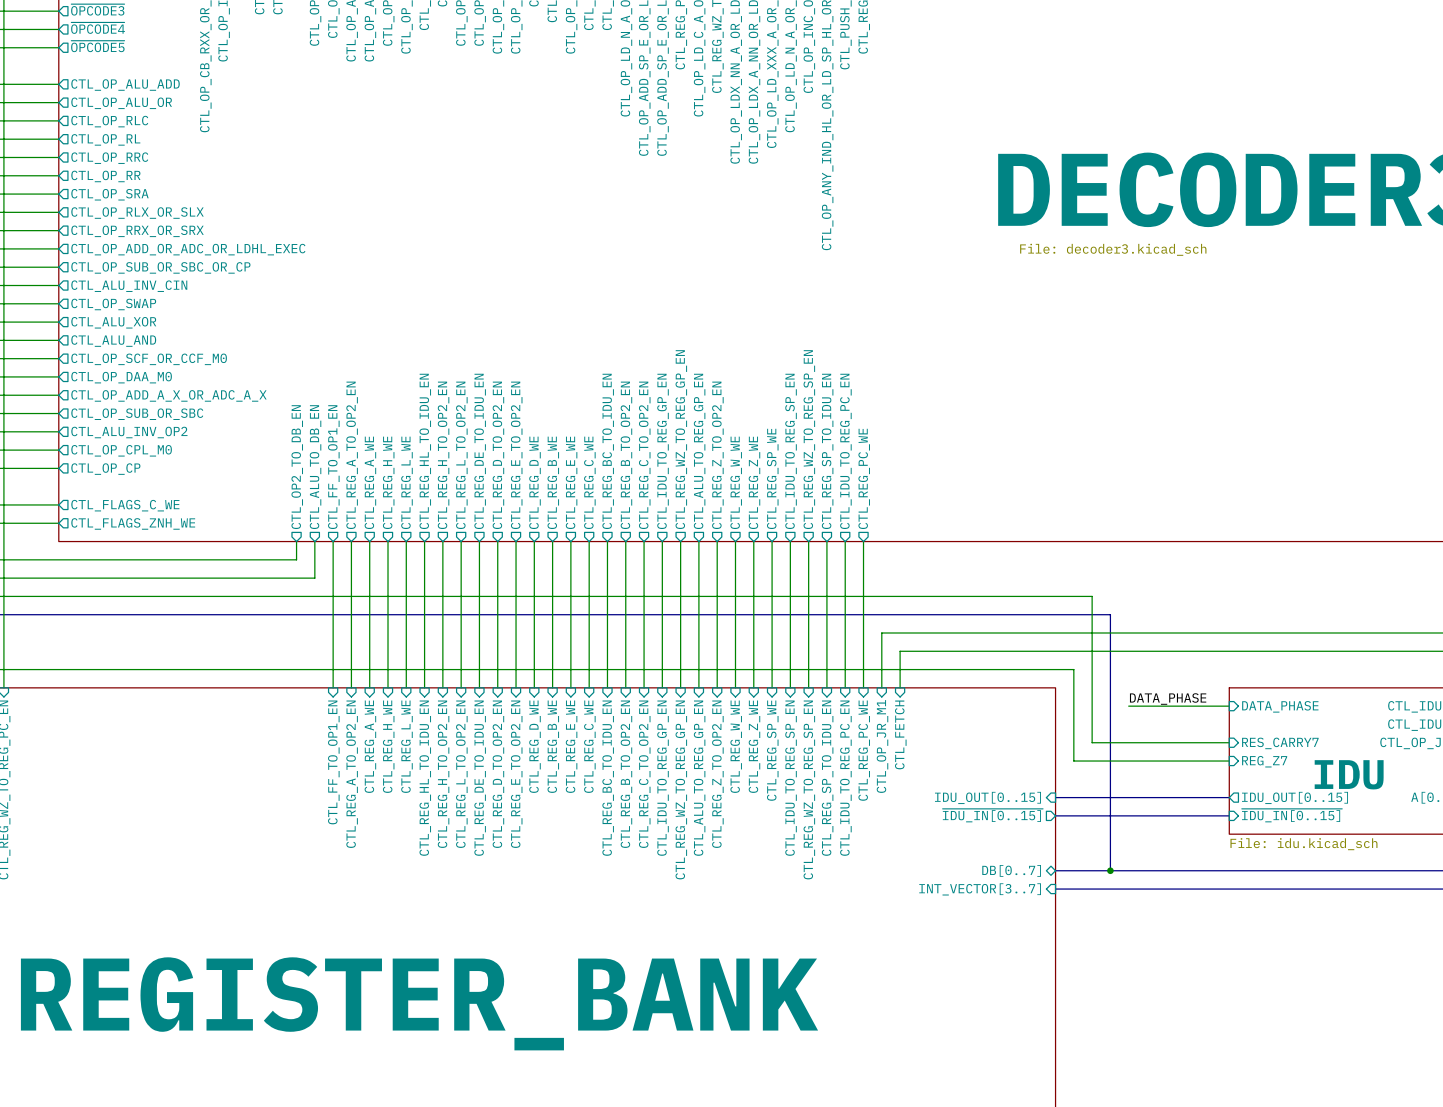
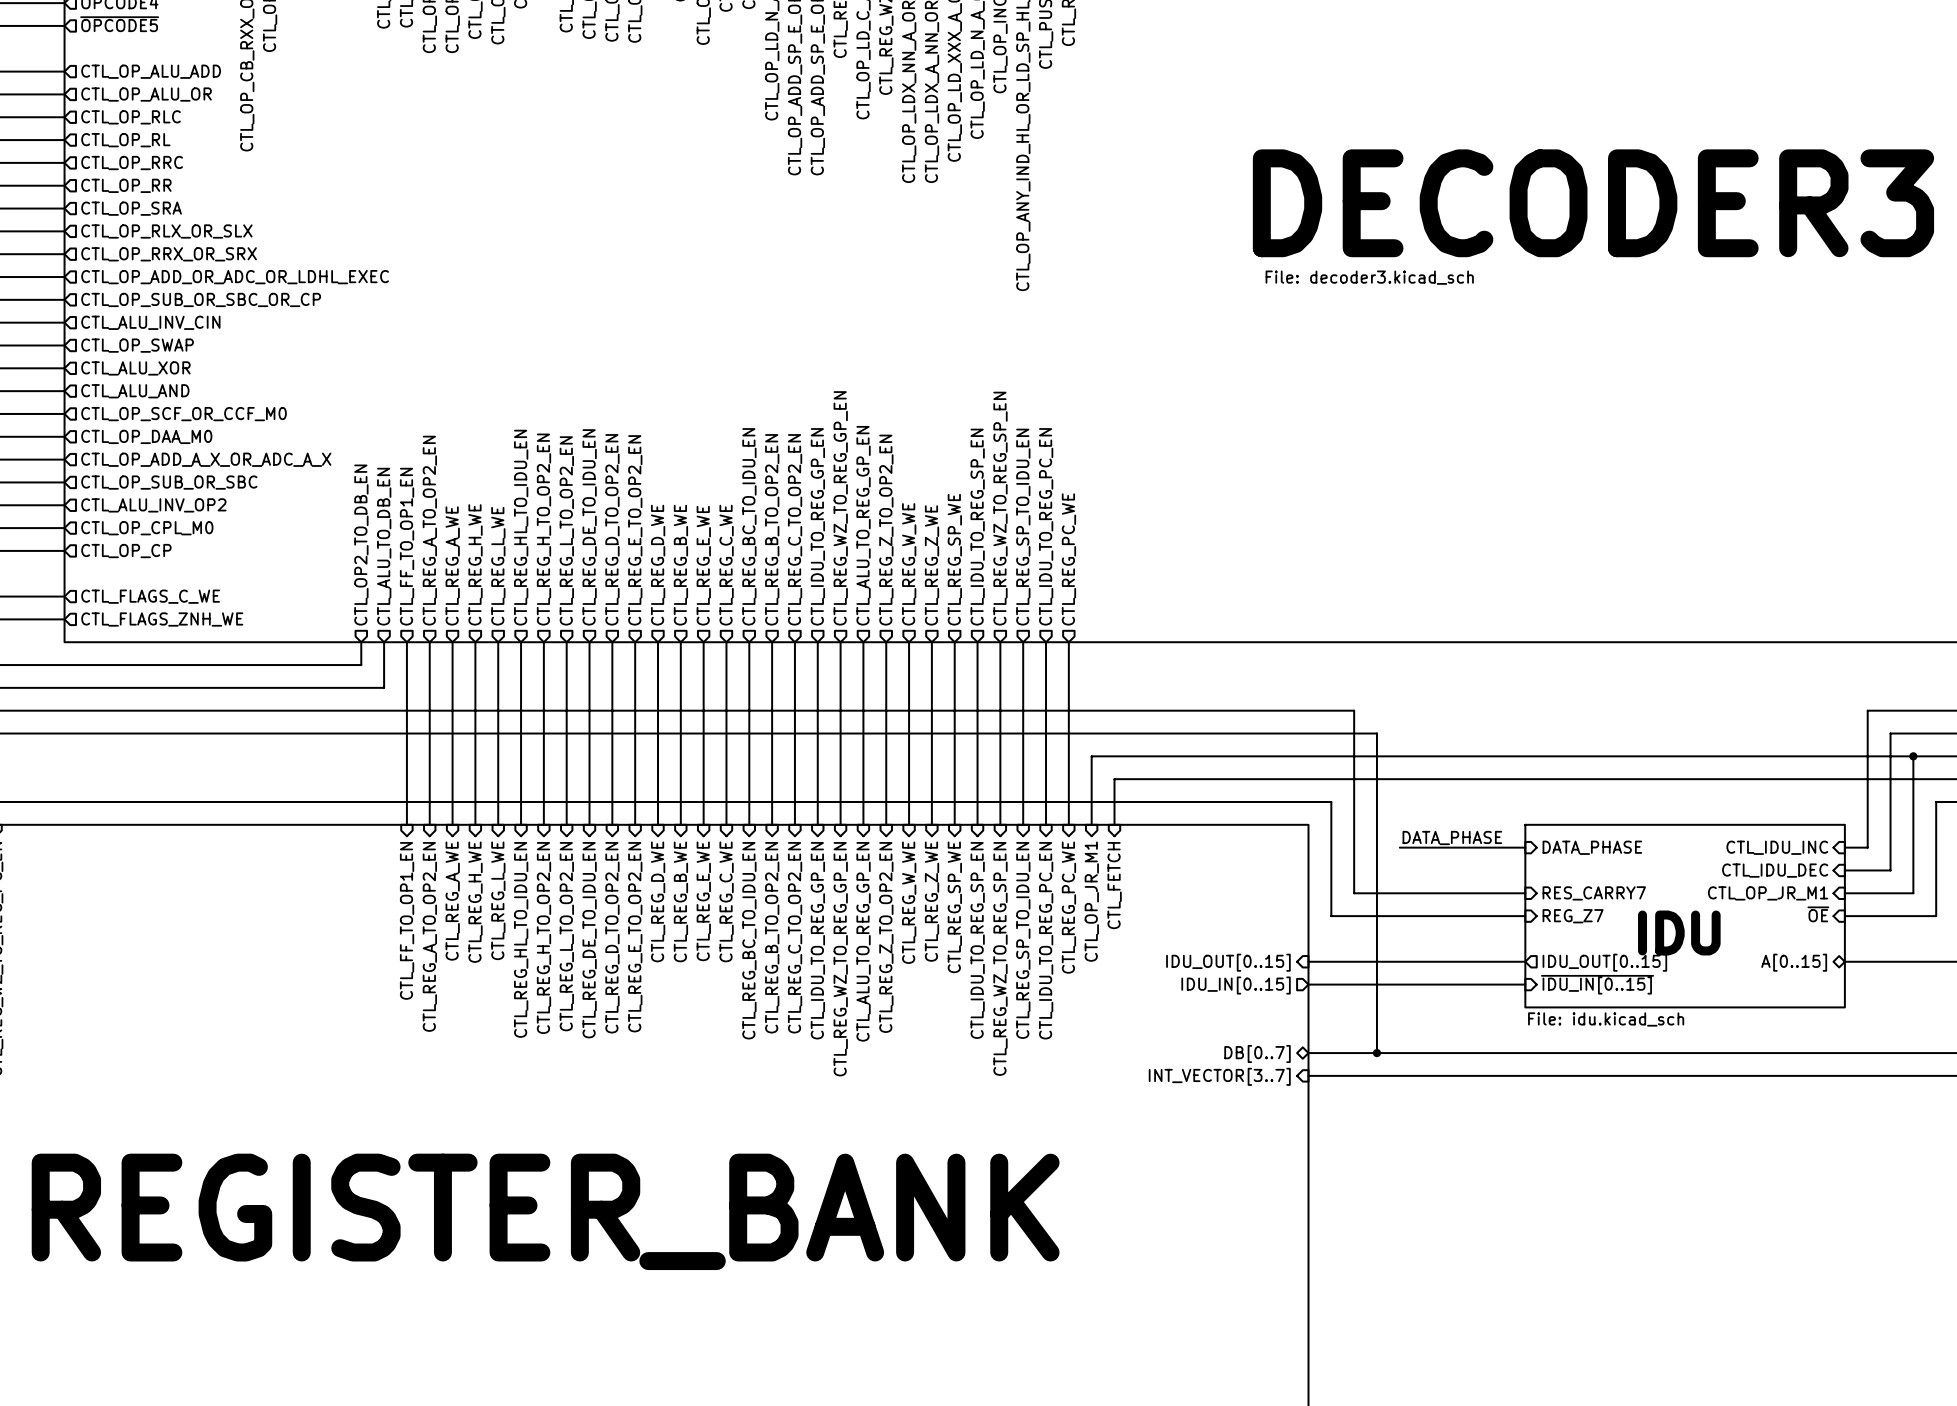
sheet pin: ~{IDU_IN[0..15]} (992, 815) -> IDU_IN[0..15] (1236, 985)

